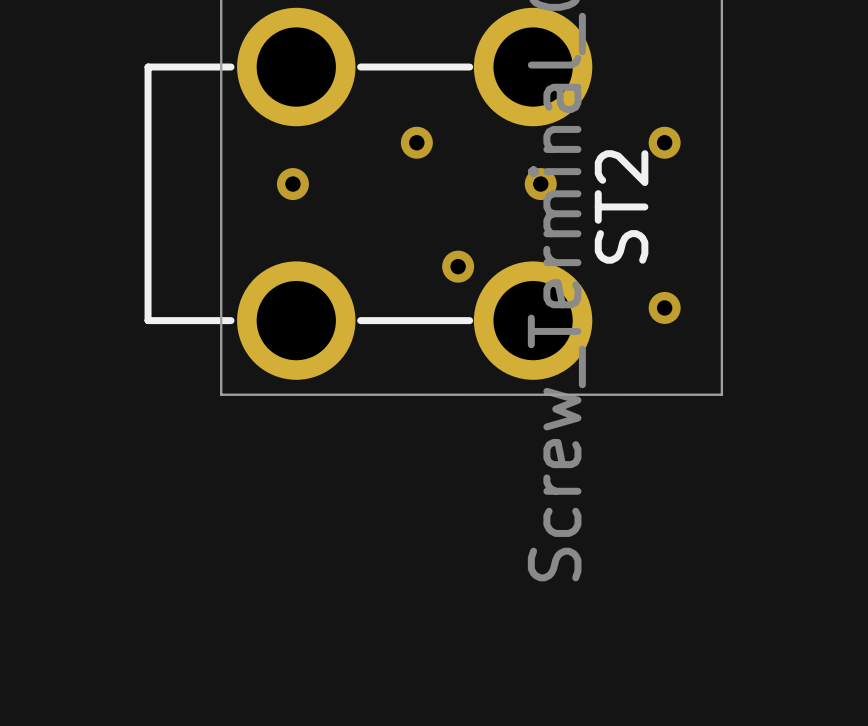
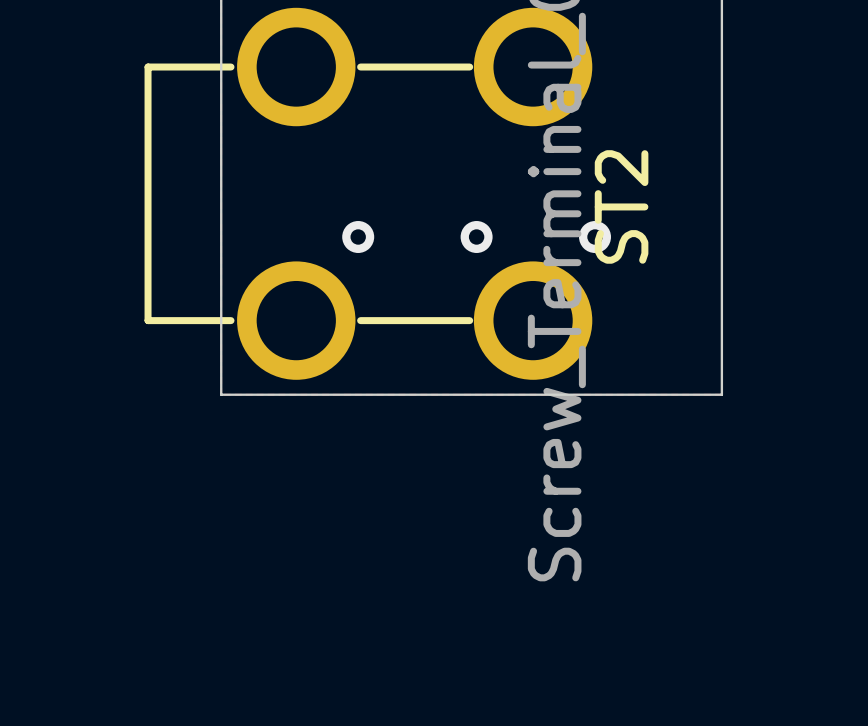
via: (416, 142) -> none
via: (664, 142) -> none
via: (292, 184) -> none
via: (540, 184) -> none
via: none -> (358, 237)
via: none -> (595, 237)
via position: (458, 266) -> (476, 237)
via: (664, 307) -> none

